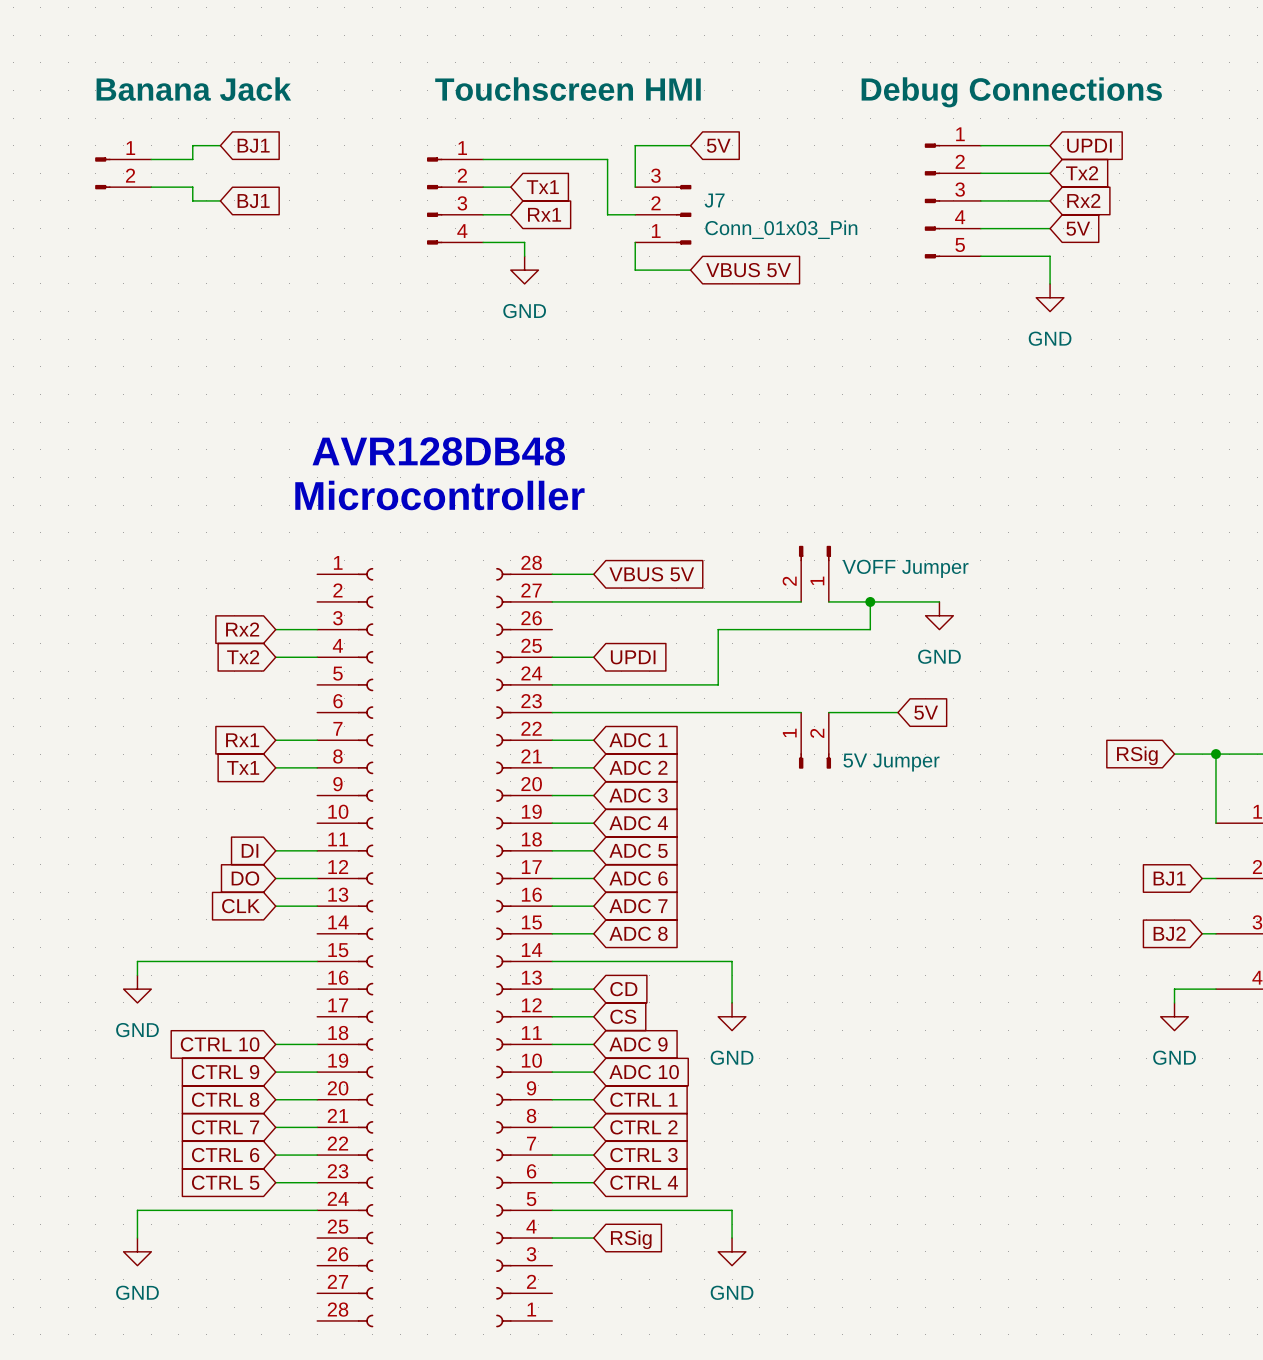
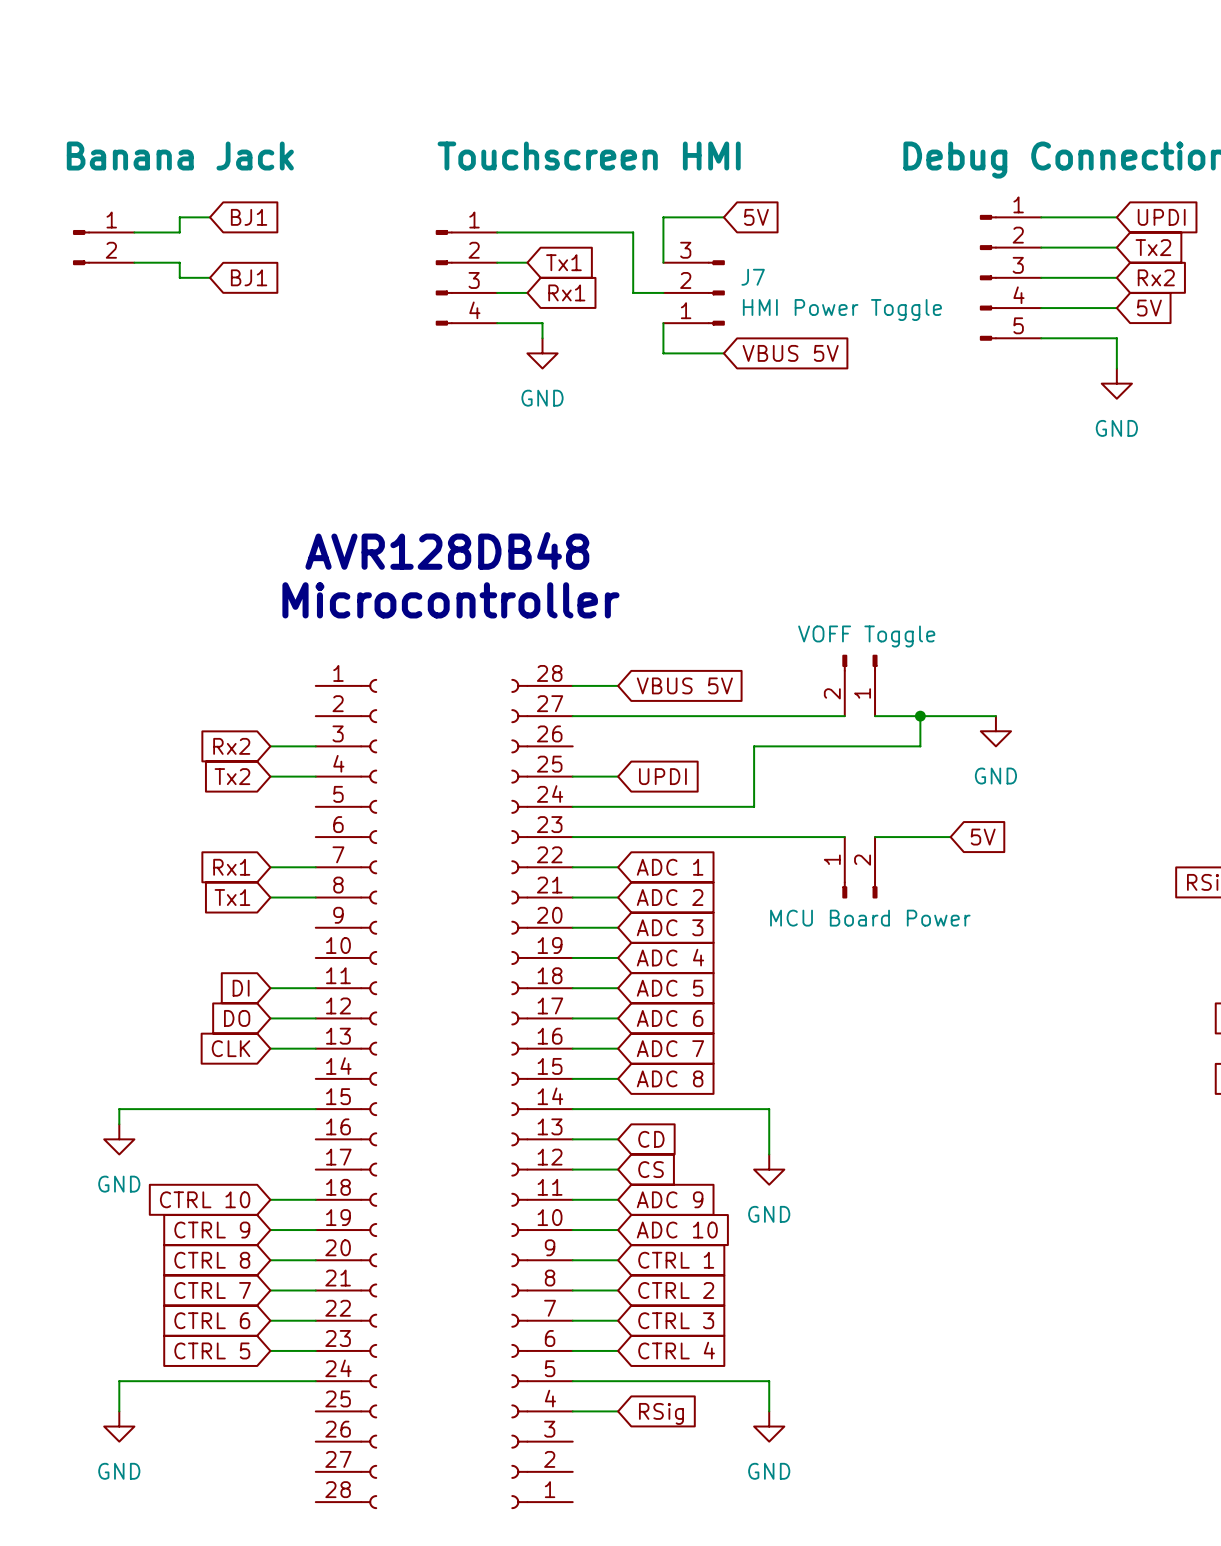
J7 value: Conn_01x03_Pin (781, 229) -> HMI Power Toggle (842, 310)
part value: VOFF Jumper (905, 568) -> VOFF Toggle (866, 636)
part value: 5V Jumper (891, 762) -> MCU Board Power (870, 918)

